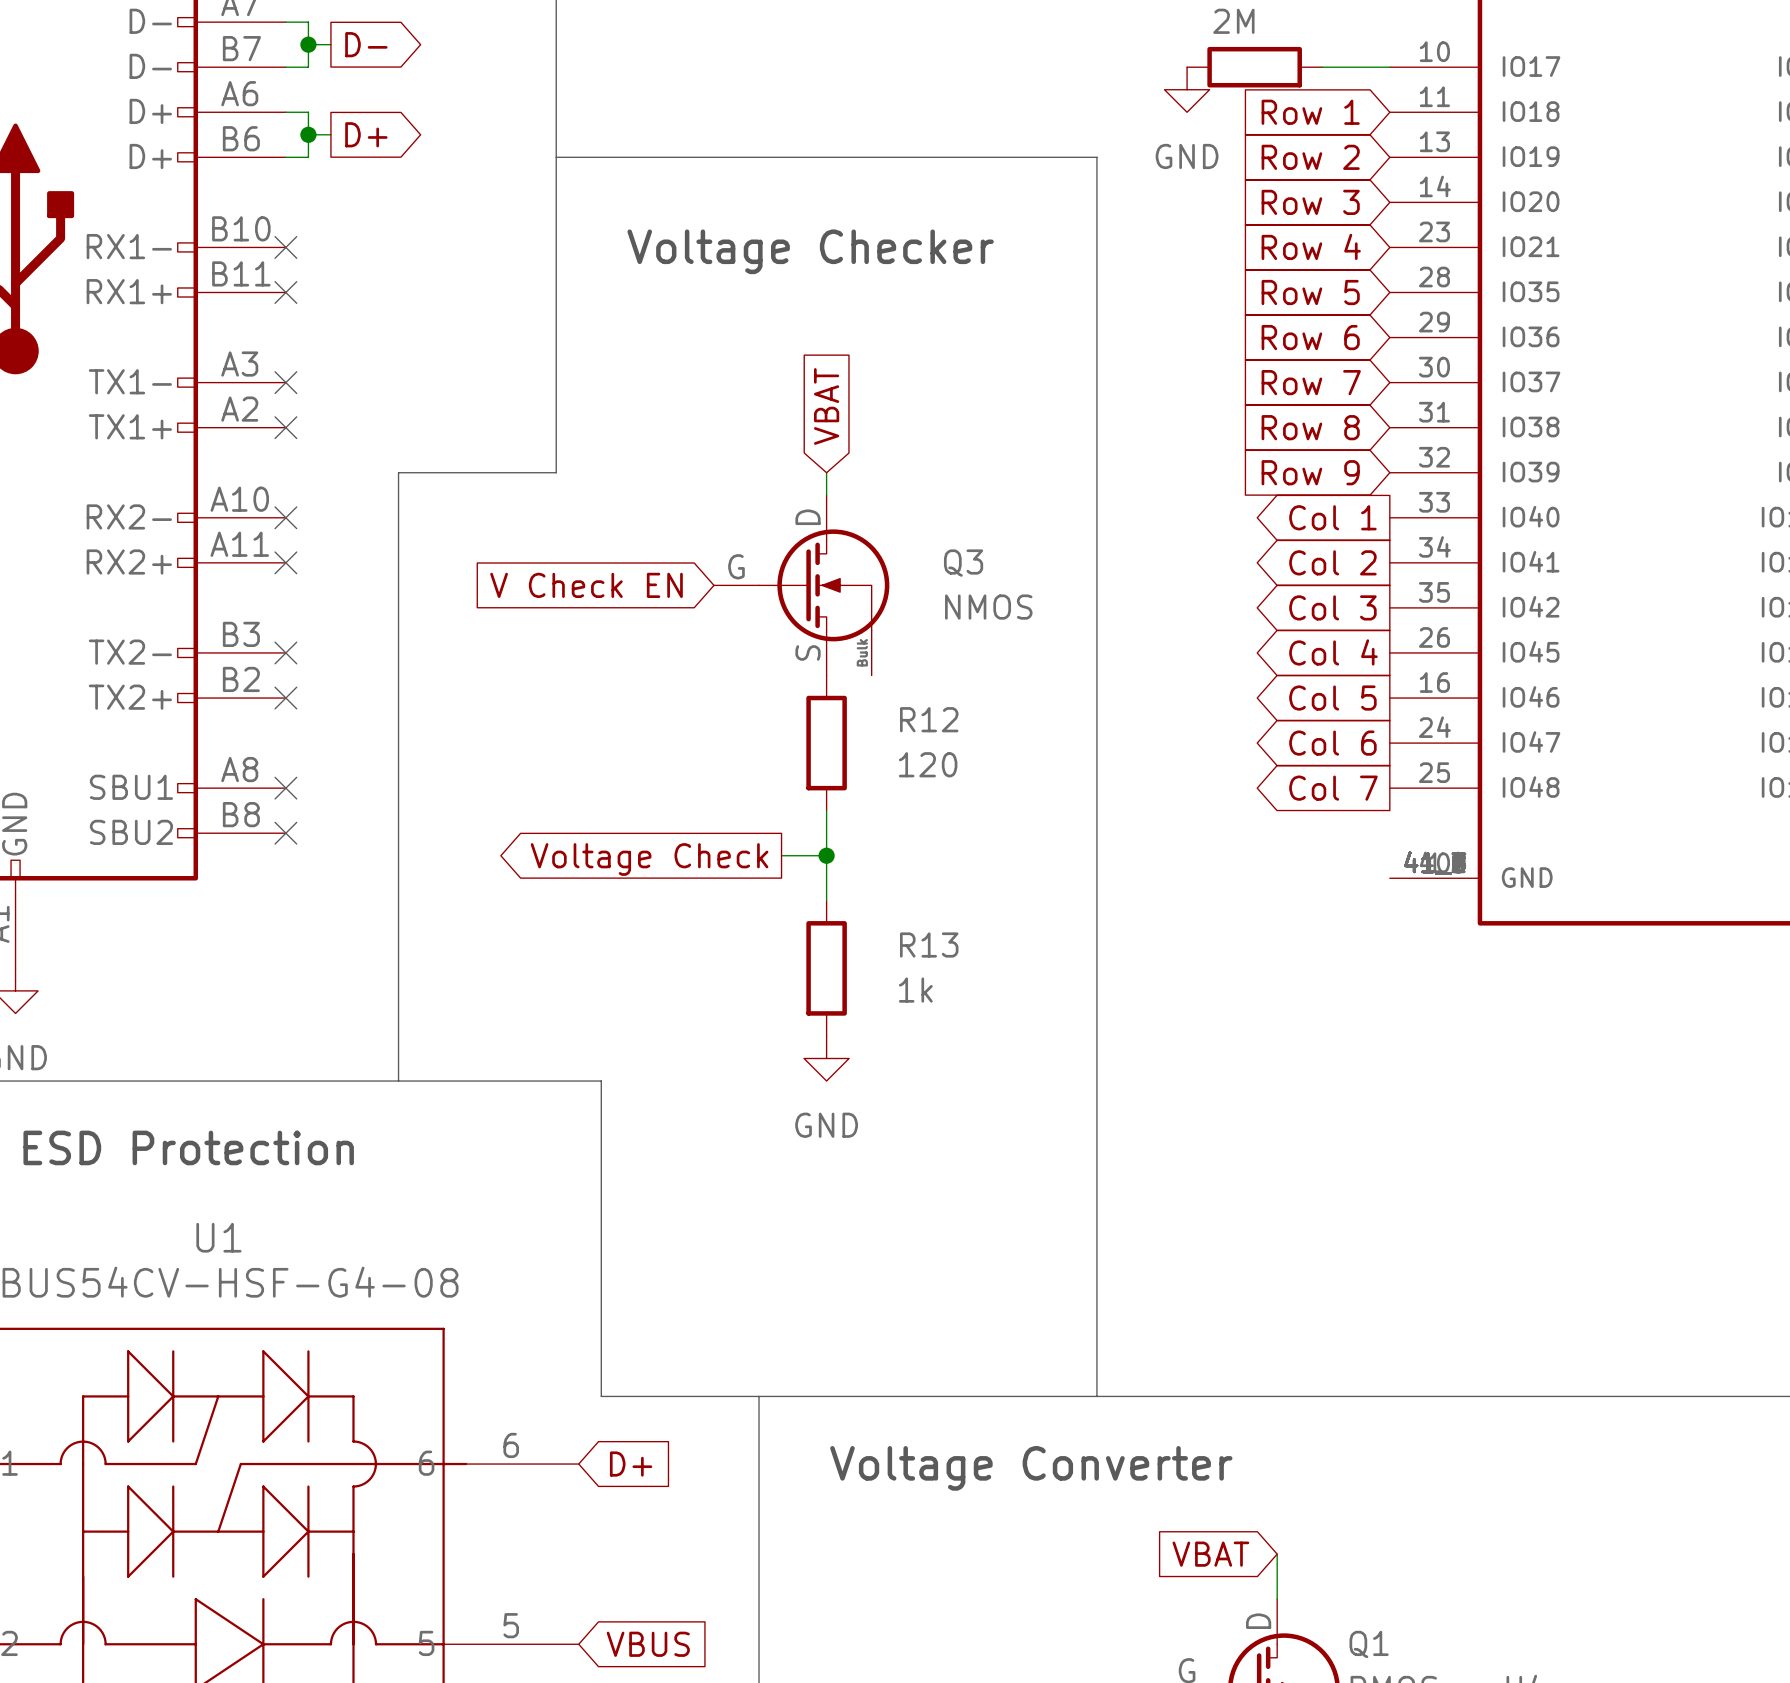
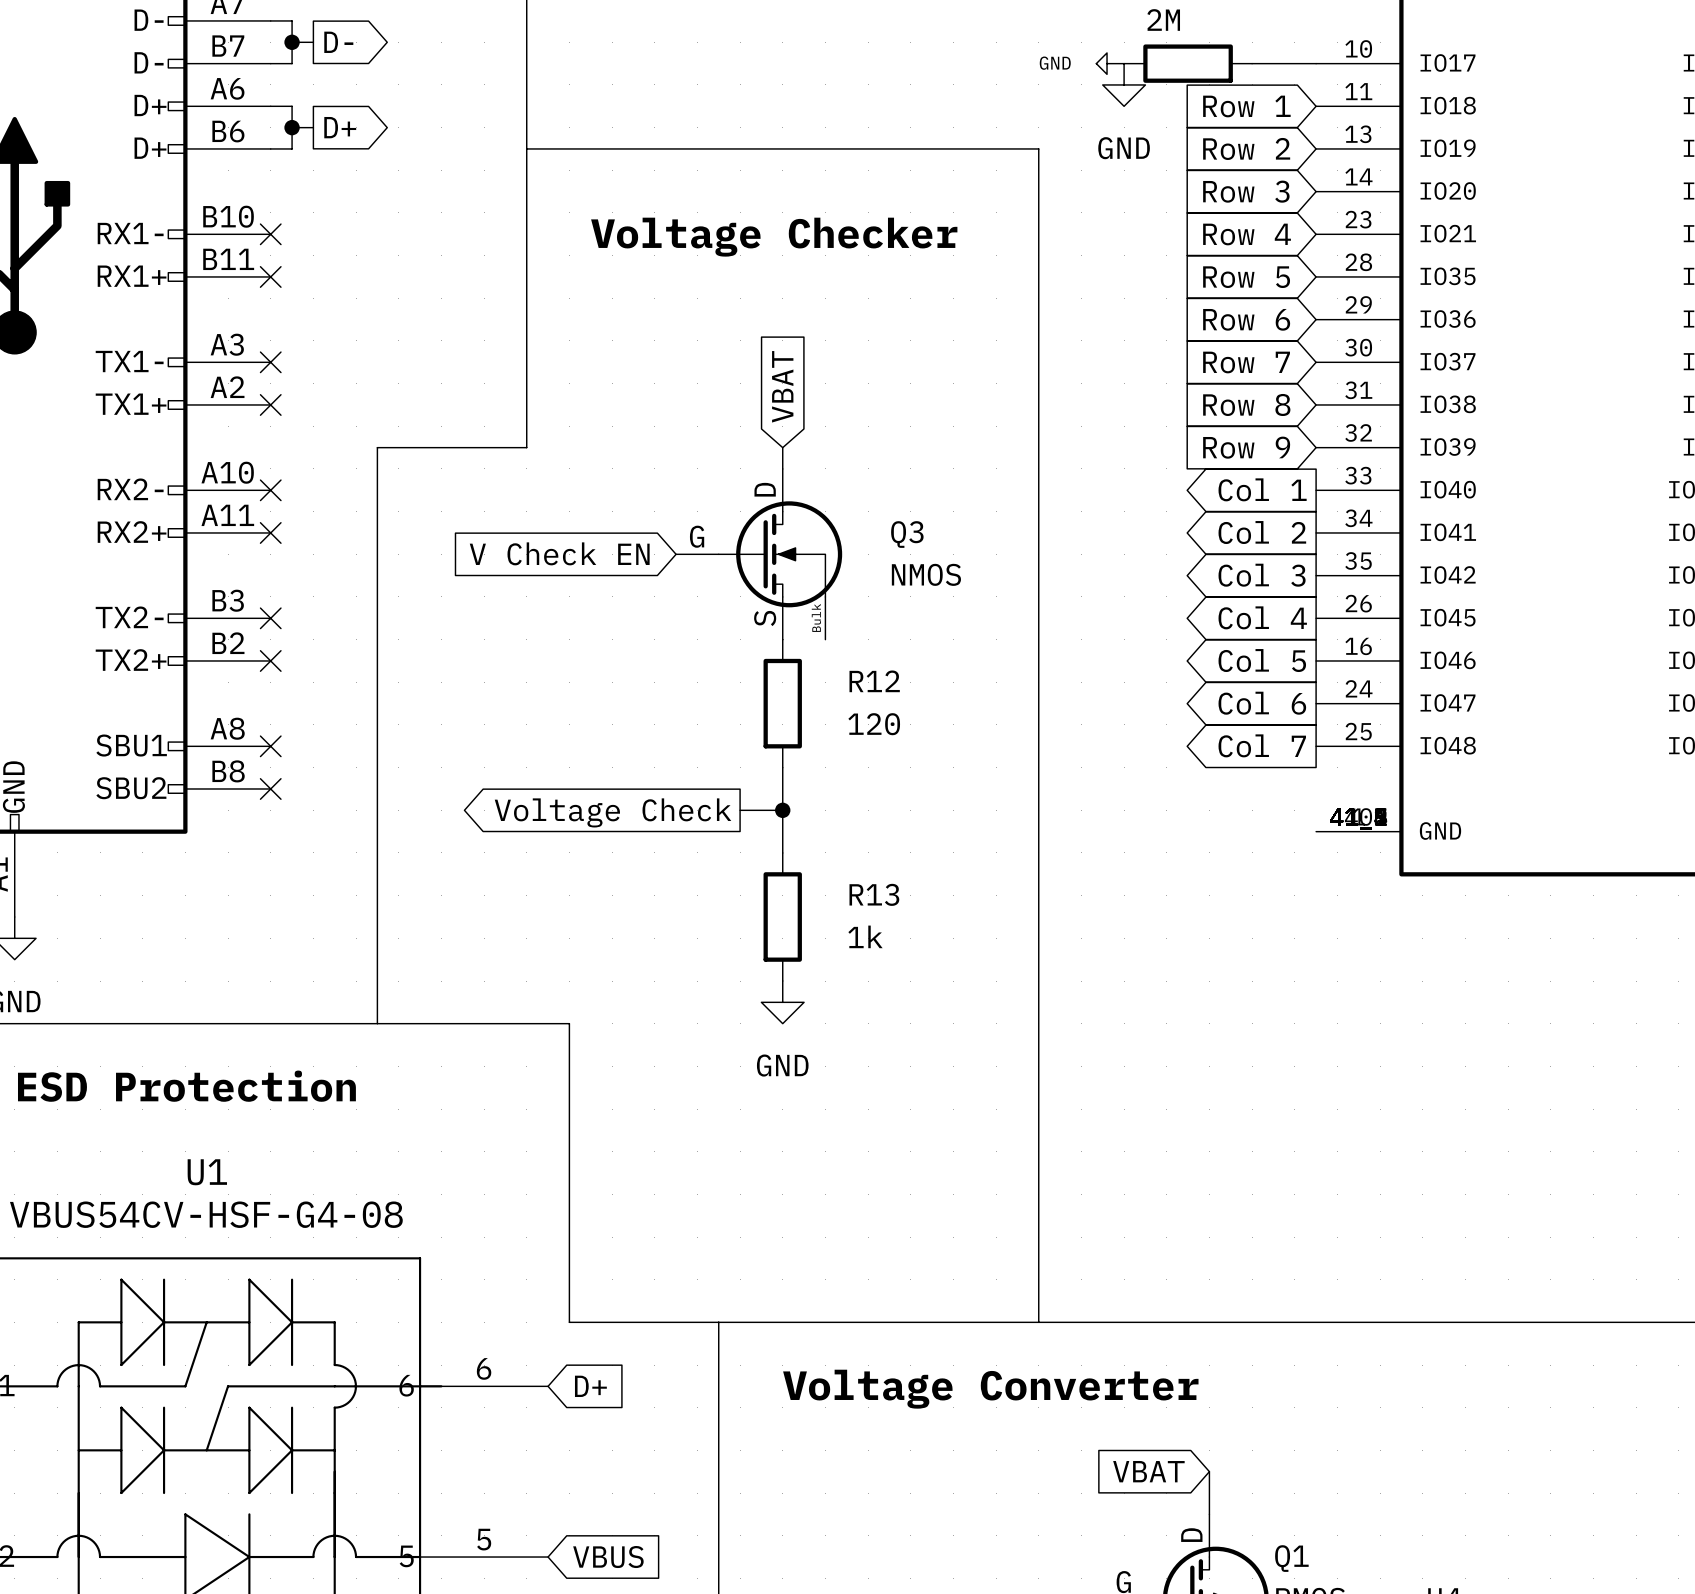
power symbol: none -> GND (1110, 63)

